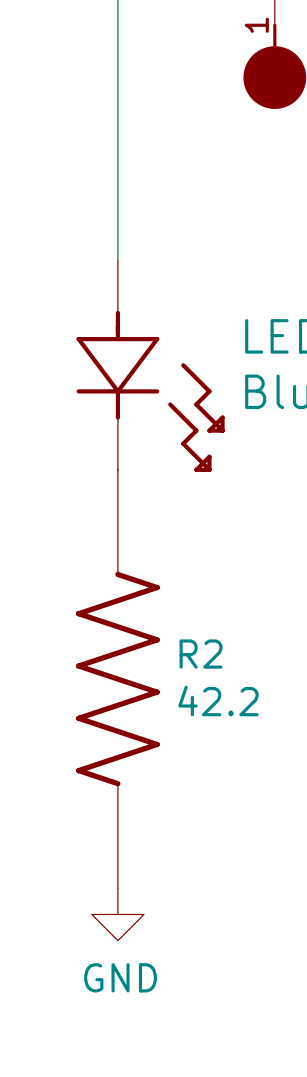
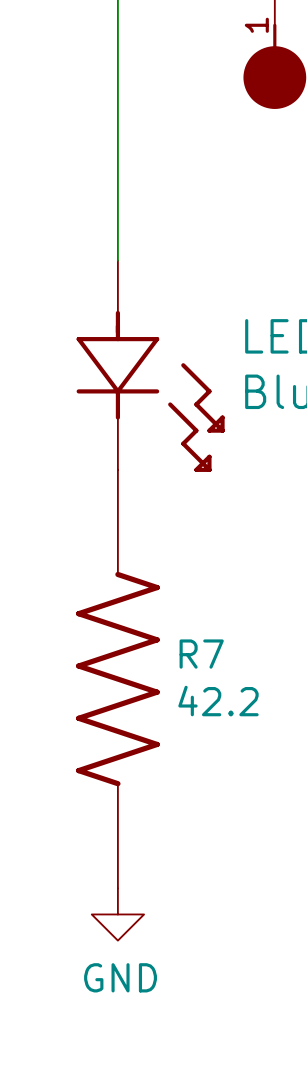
R2 name: R2 (201, 654) -> R7 (201, 654)

